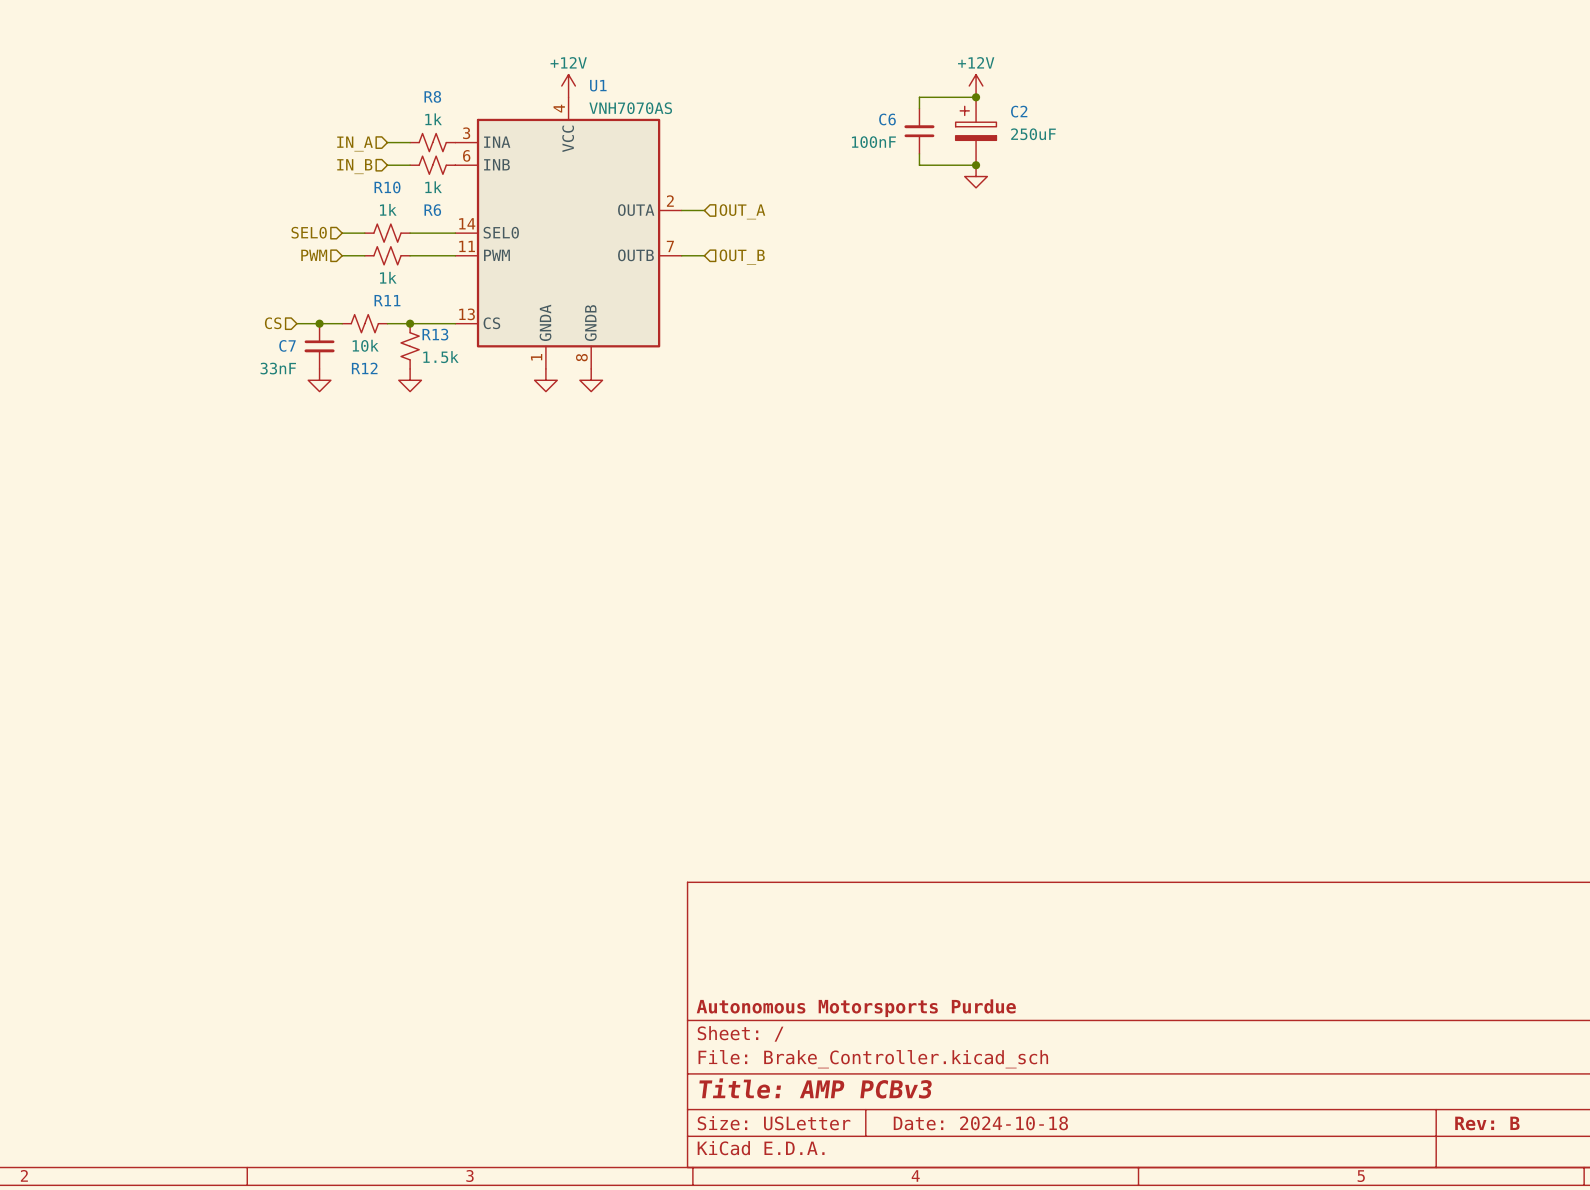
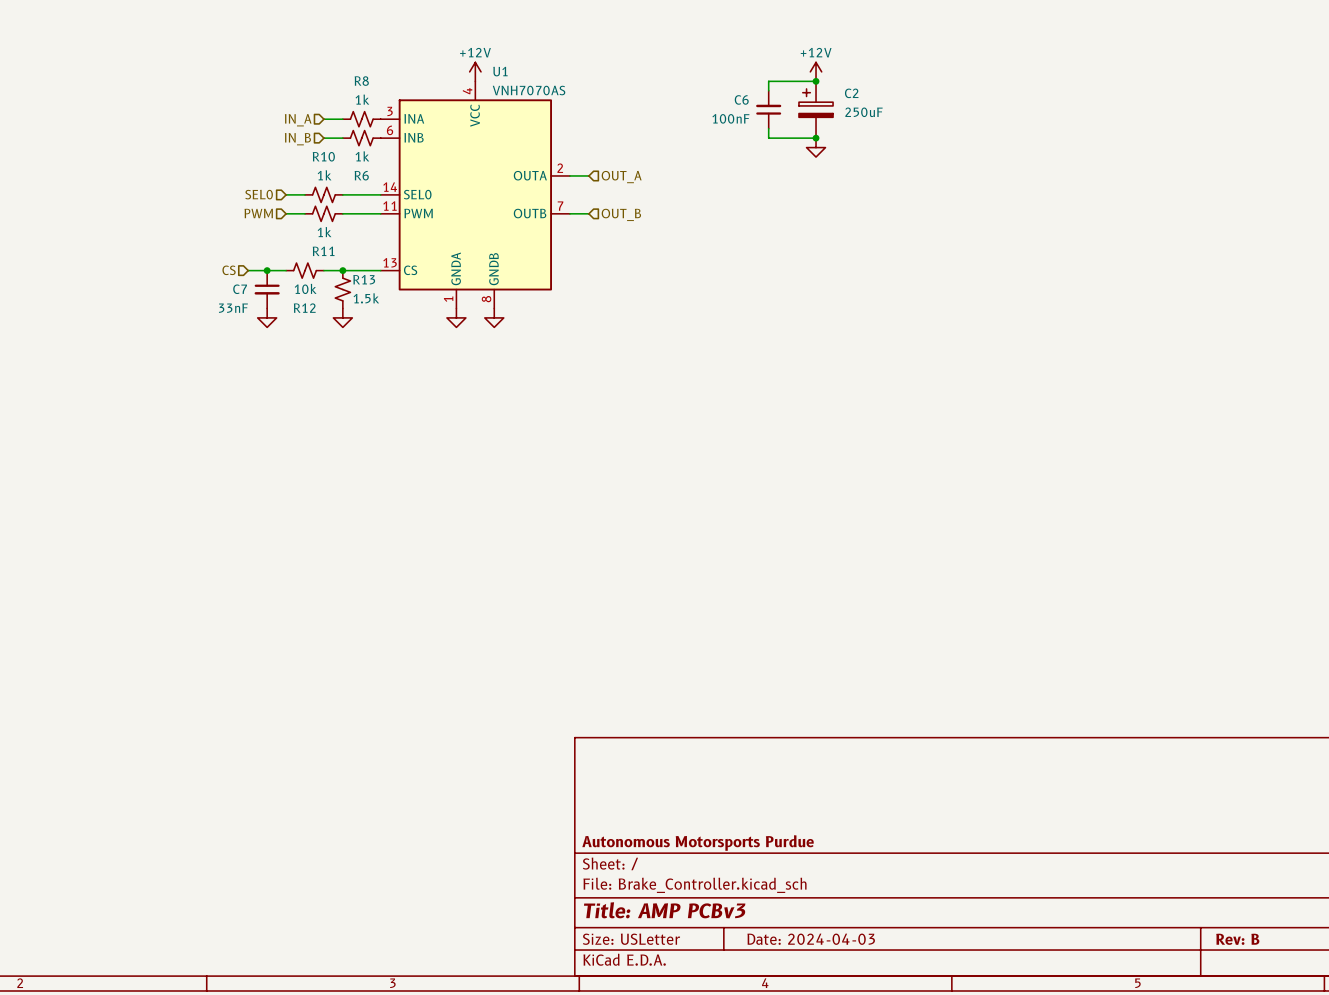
title block: Date: 2024-10-18 (980, 1123) -> Date: 2024-04-03 (811, 939)

